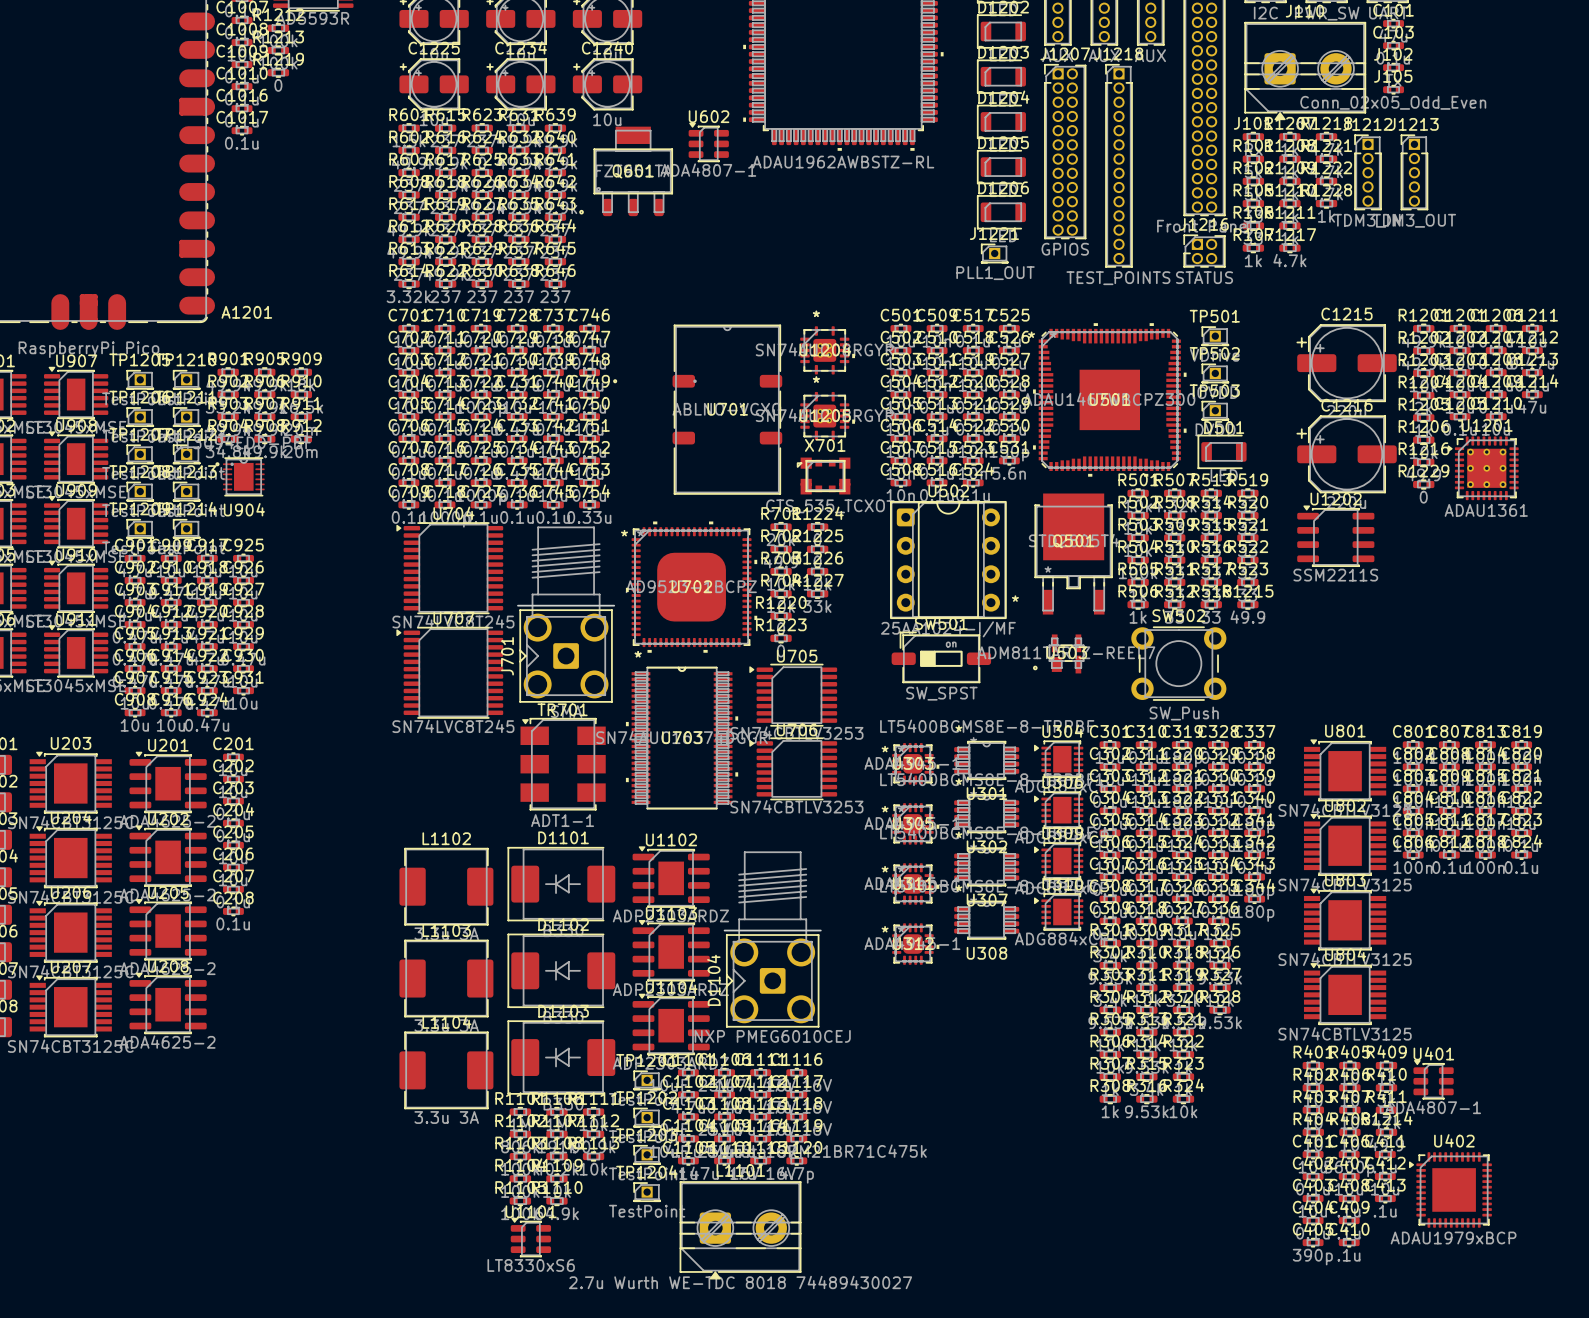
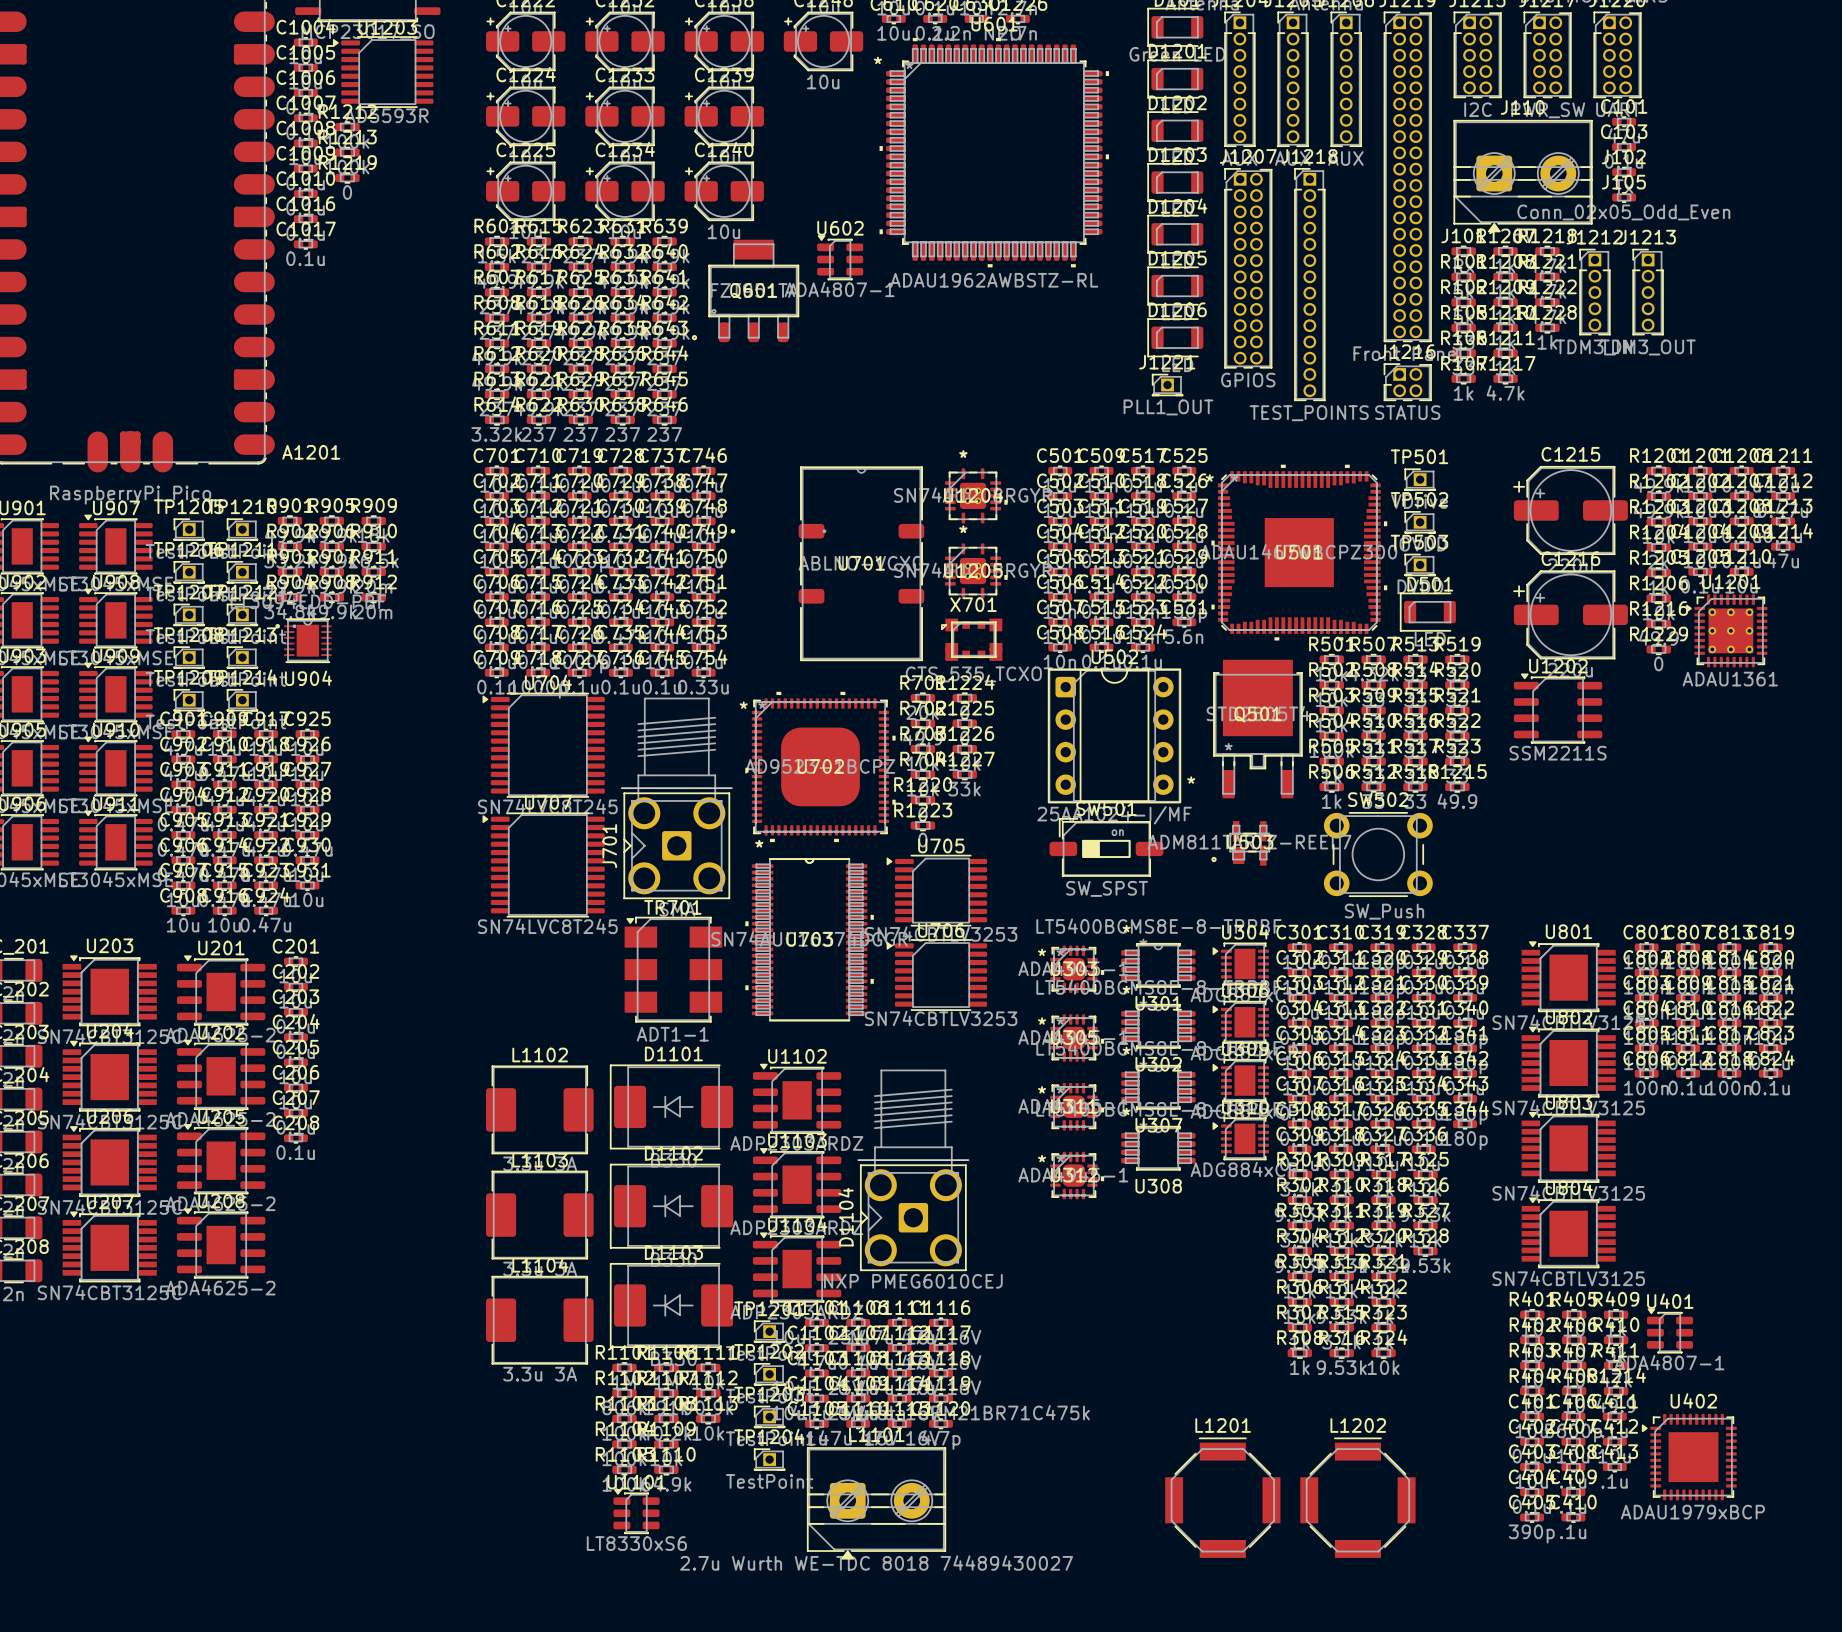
L1201: none -> (1222, 1497)
L1202: none -> (1357, 1497)

